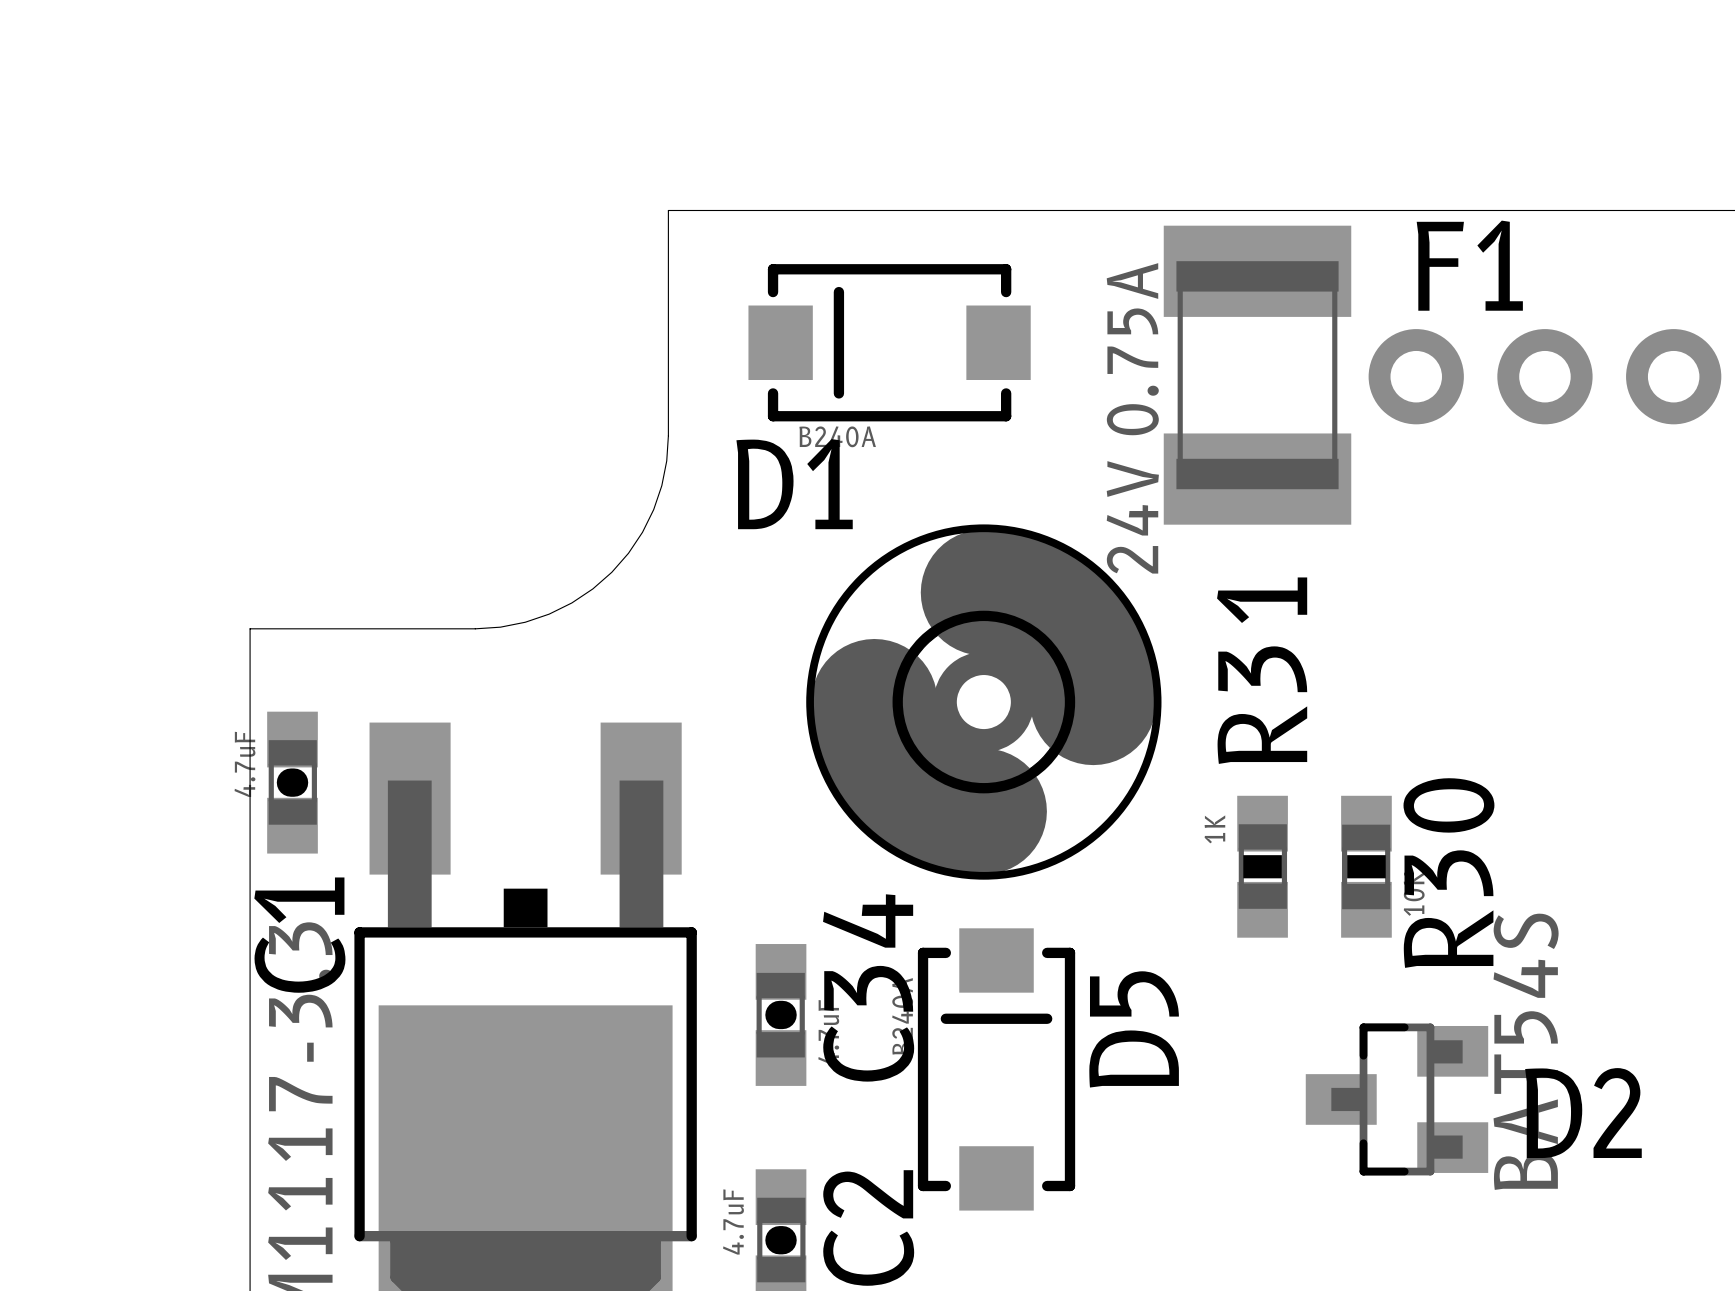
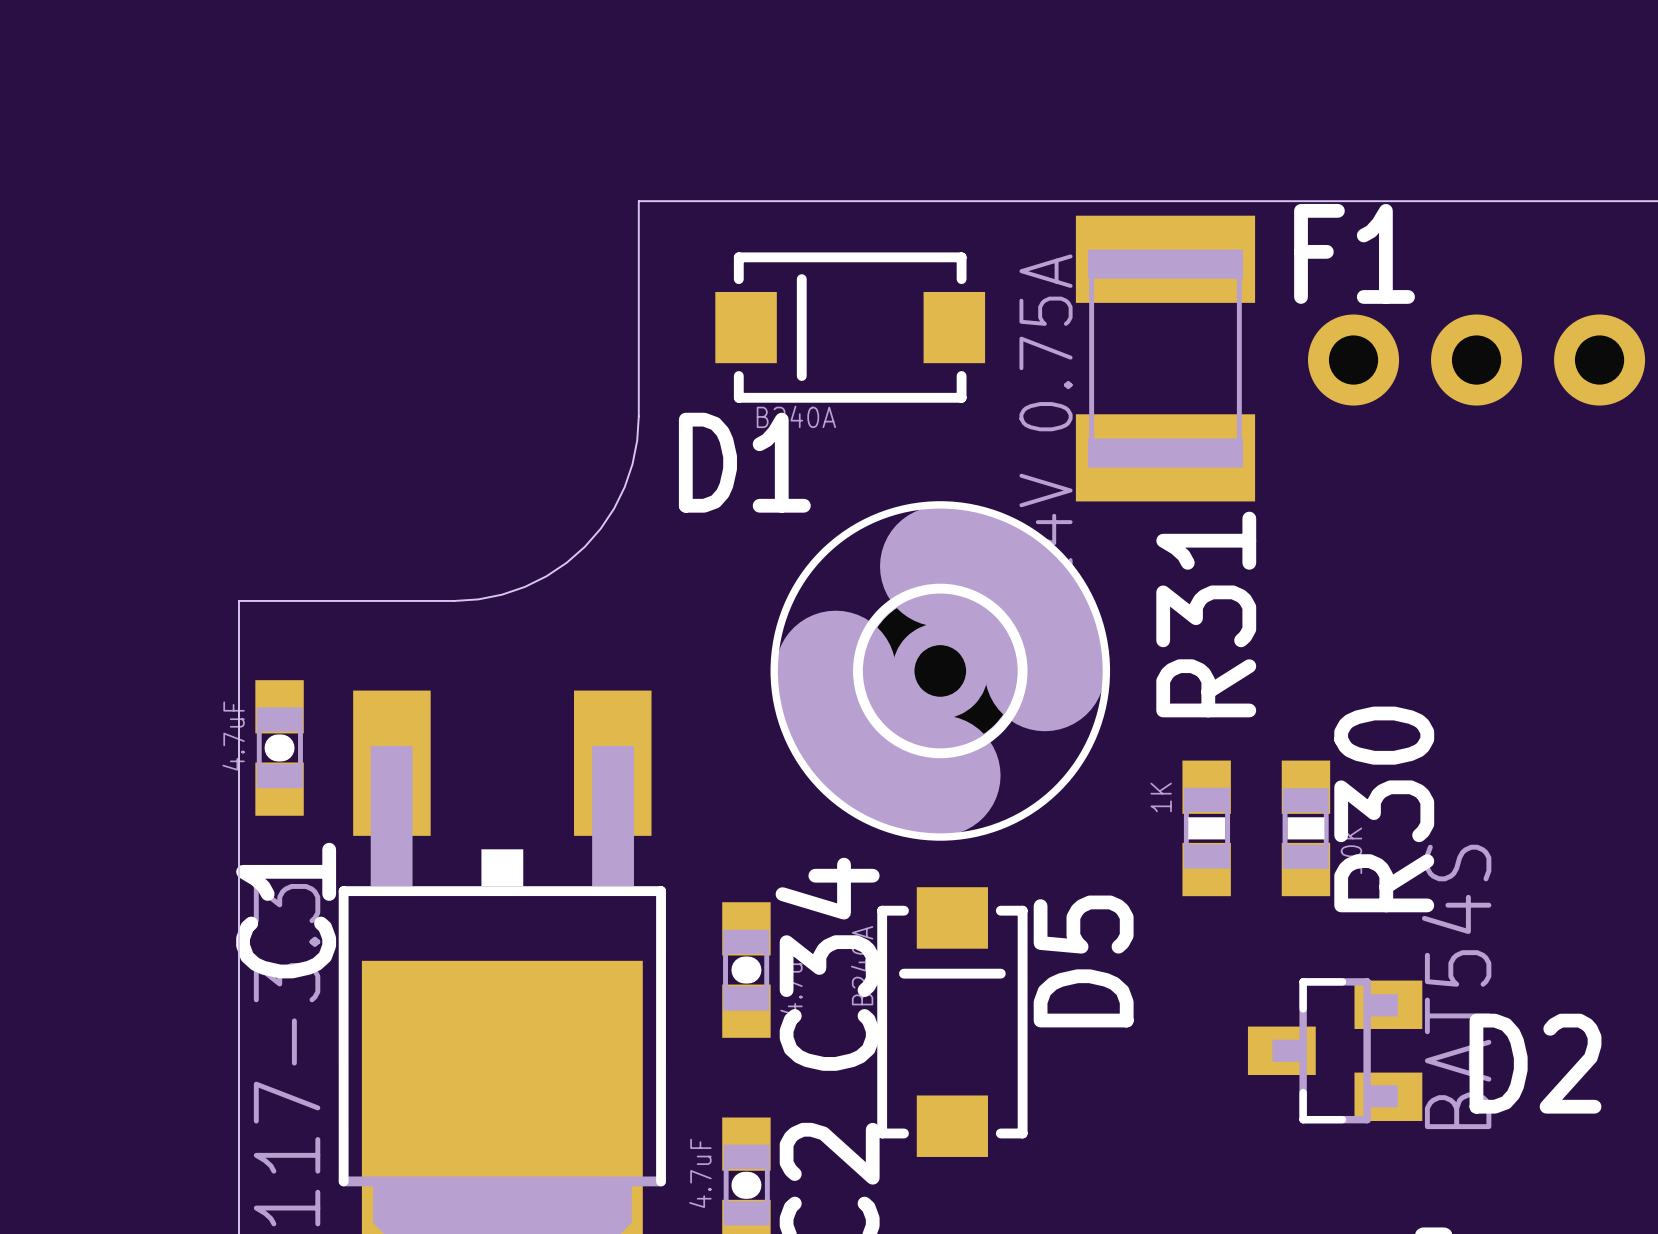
F1 position: (1257, 375) -> (1165, 358)

